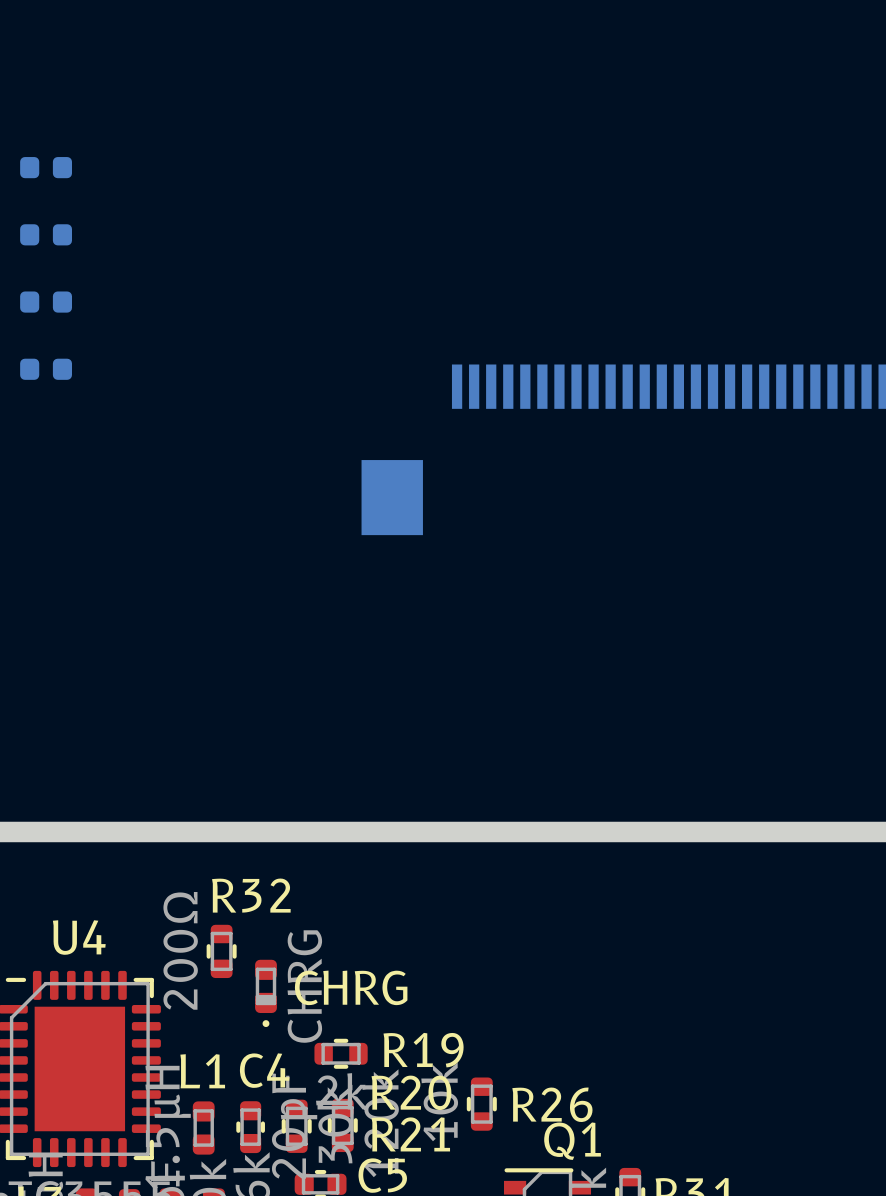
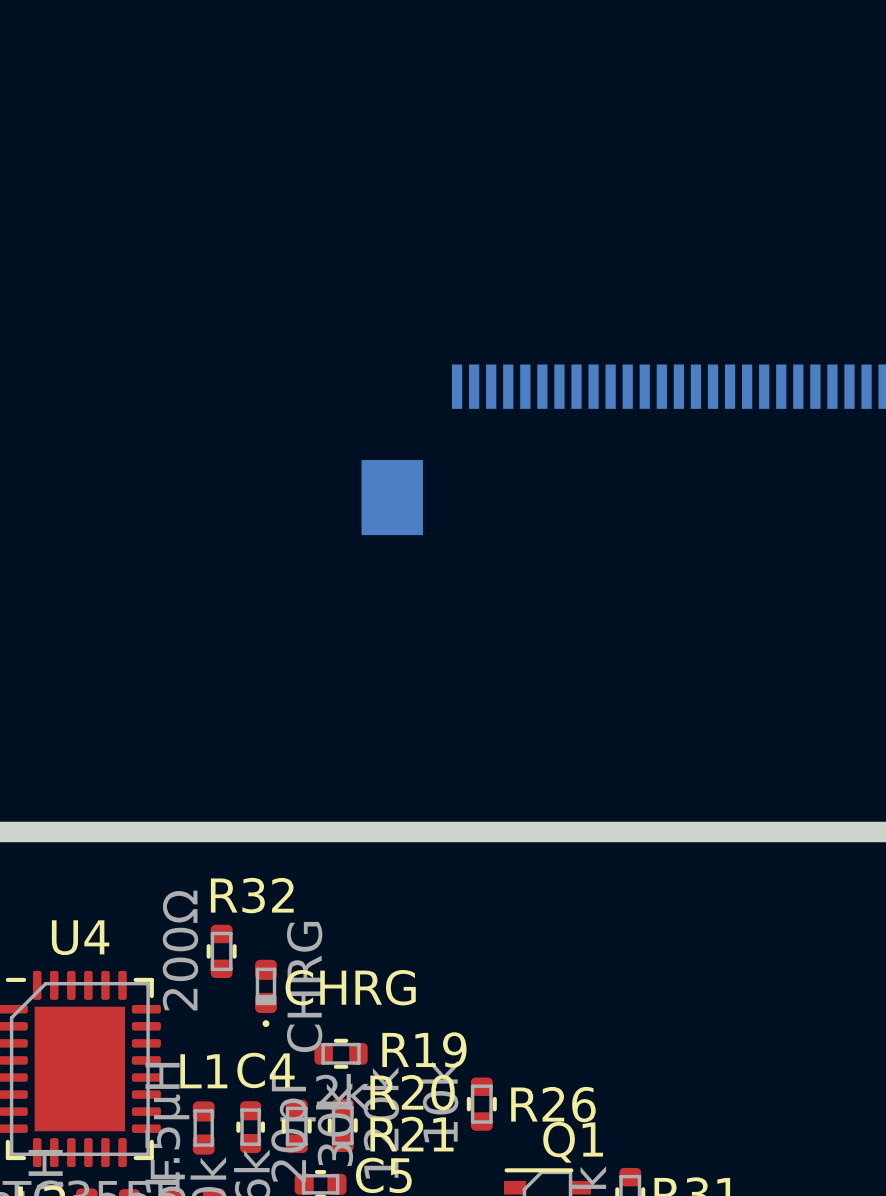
part: (46, 167) -> none
part: (46, 234) -> none
part: (46, 302) -> none
part: (46, 369) -> none

